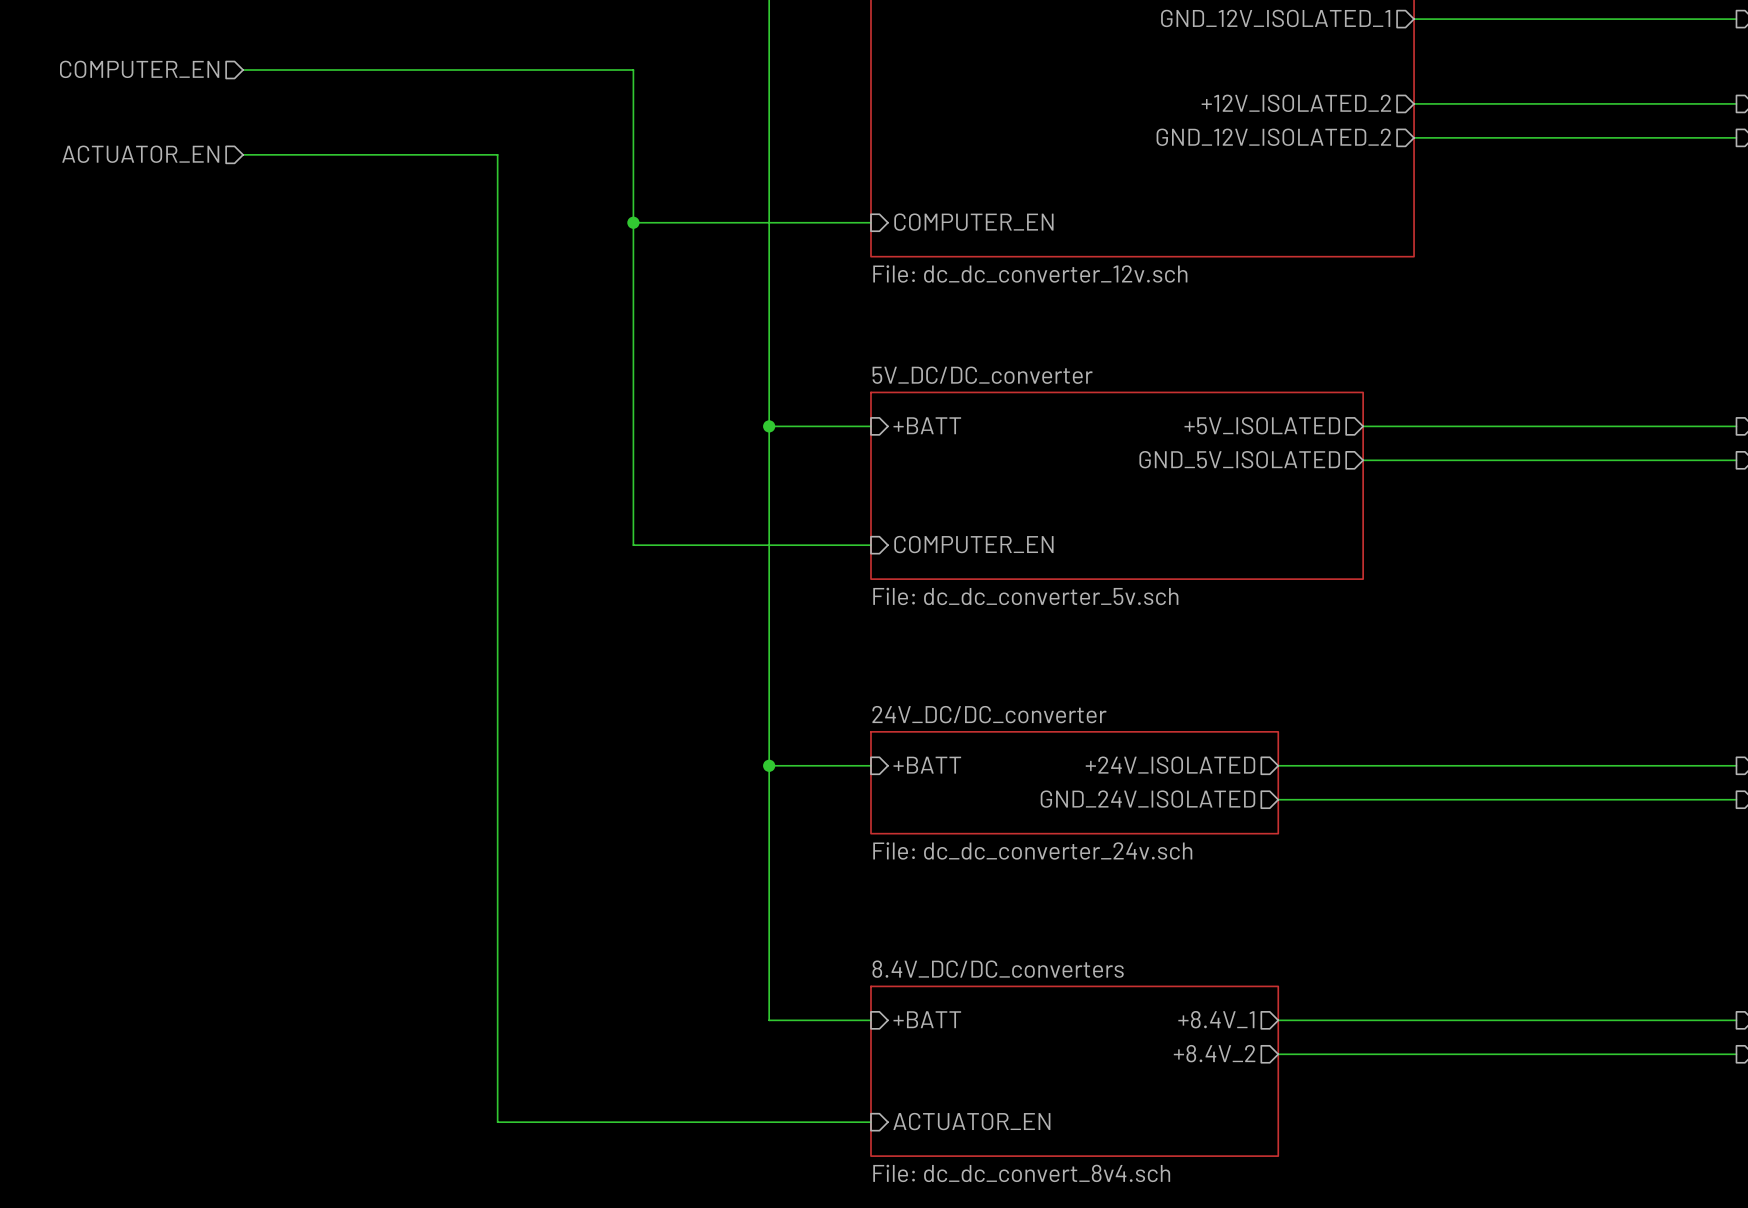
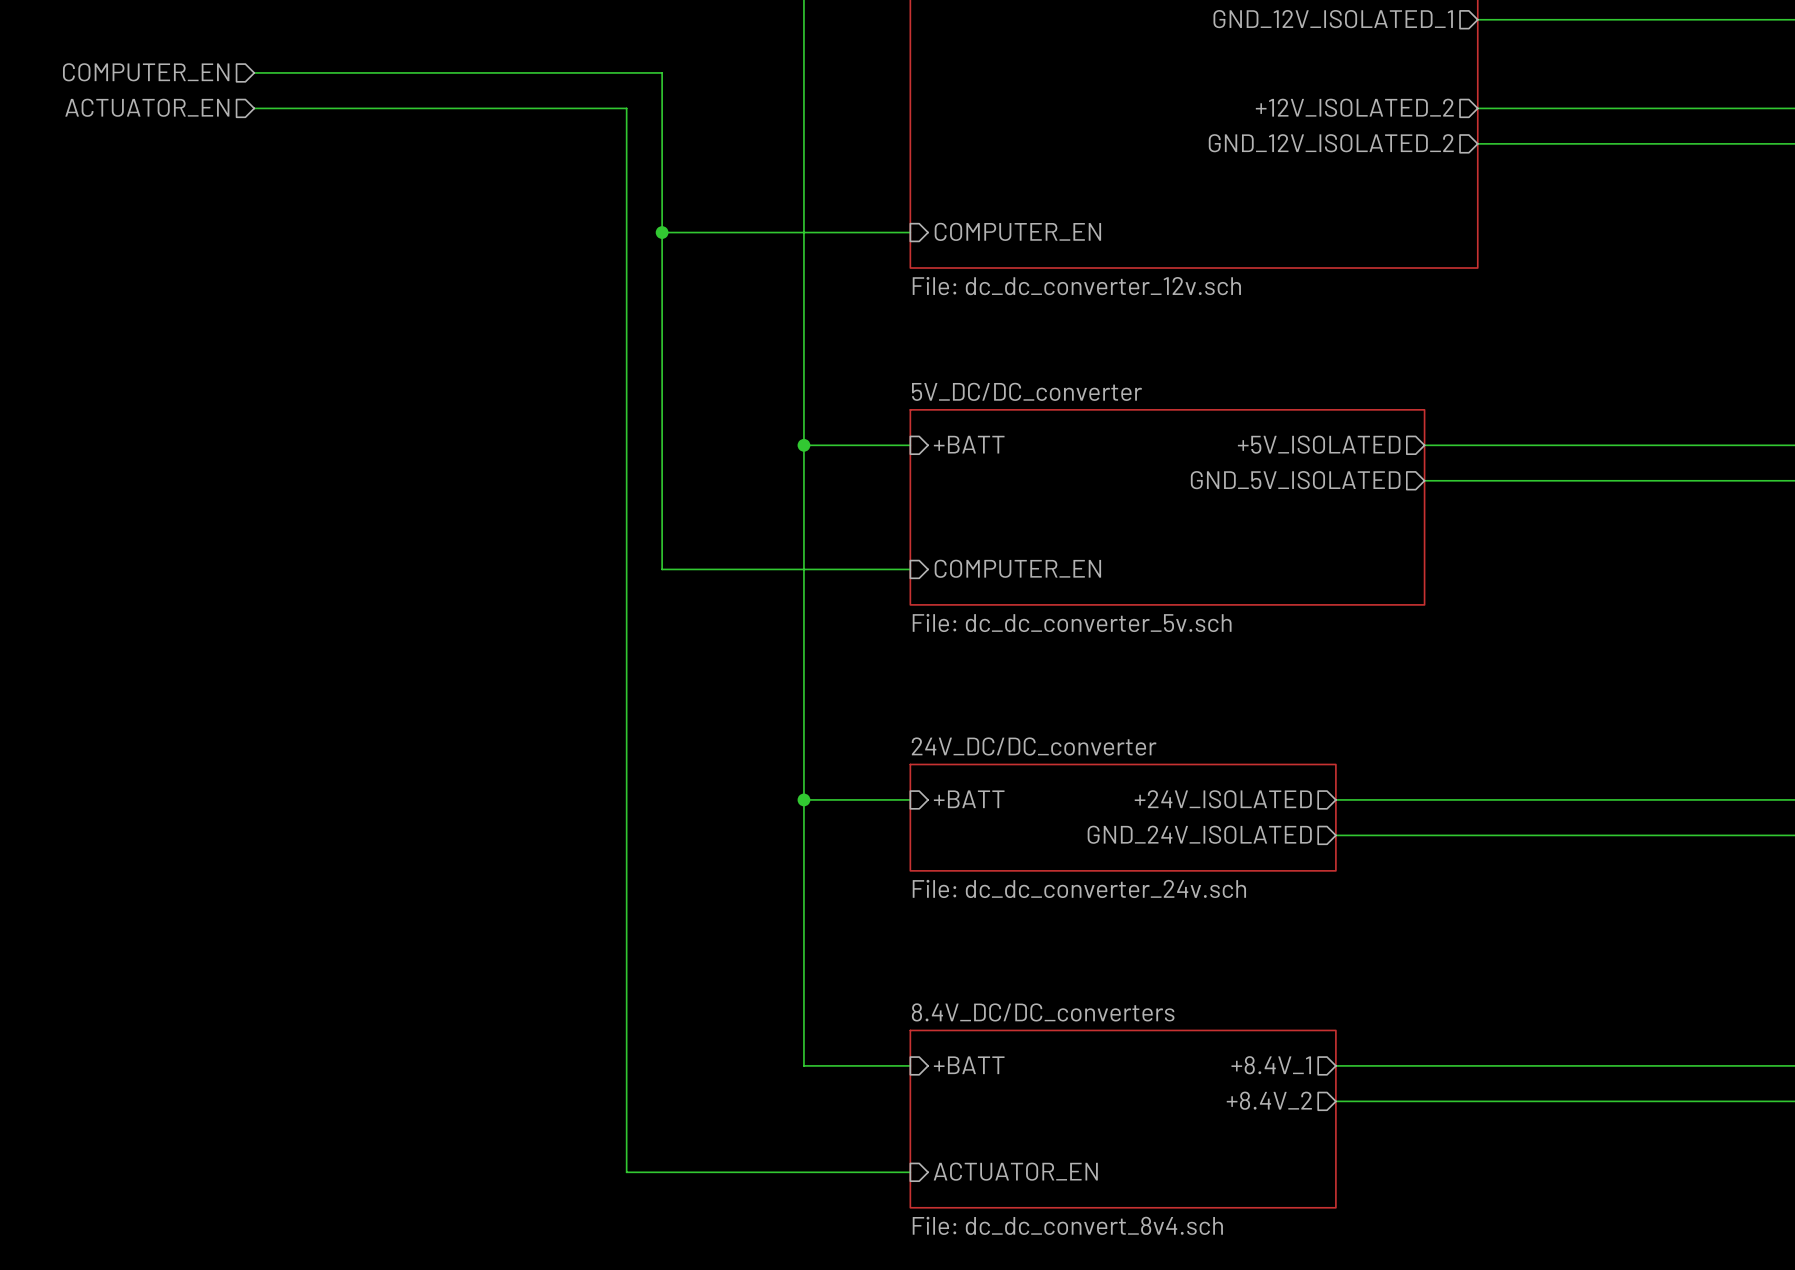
hierarchical label position: ACTUATOR_EN (140, 154) -> ACTUATOR_EN (147, 107)
wire: (243, 154) (497, 154) (497, 1122) (599, 1122) -> (254, 108) (626, 108) (626, 1172)

